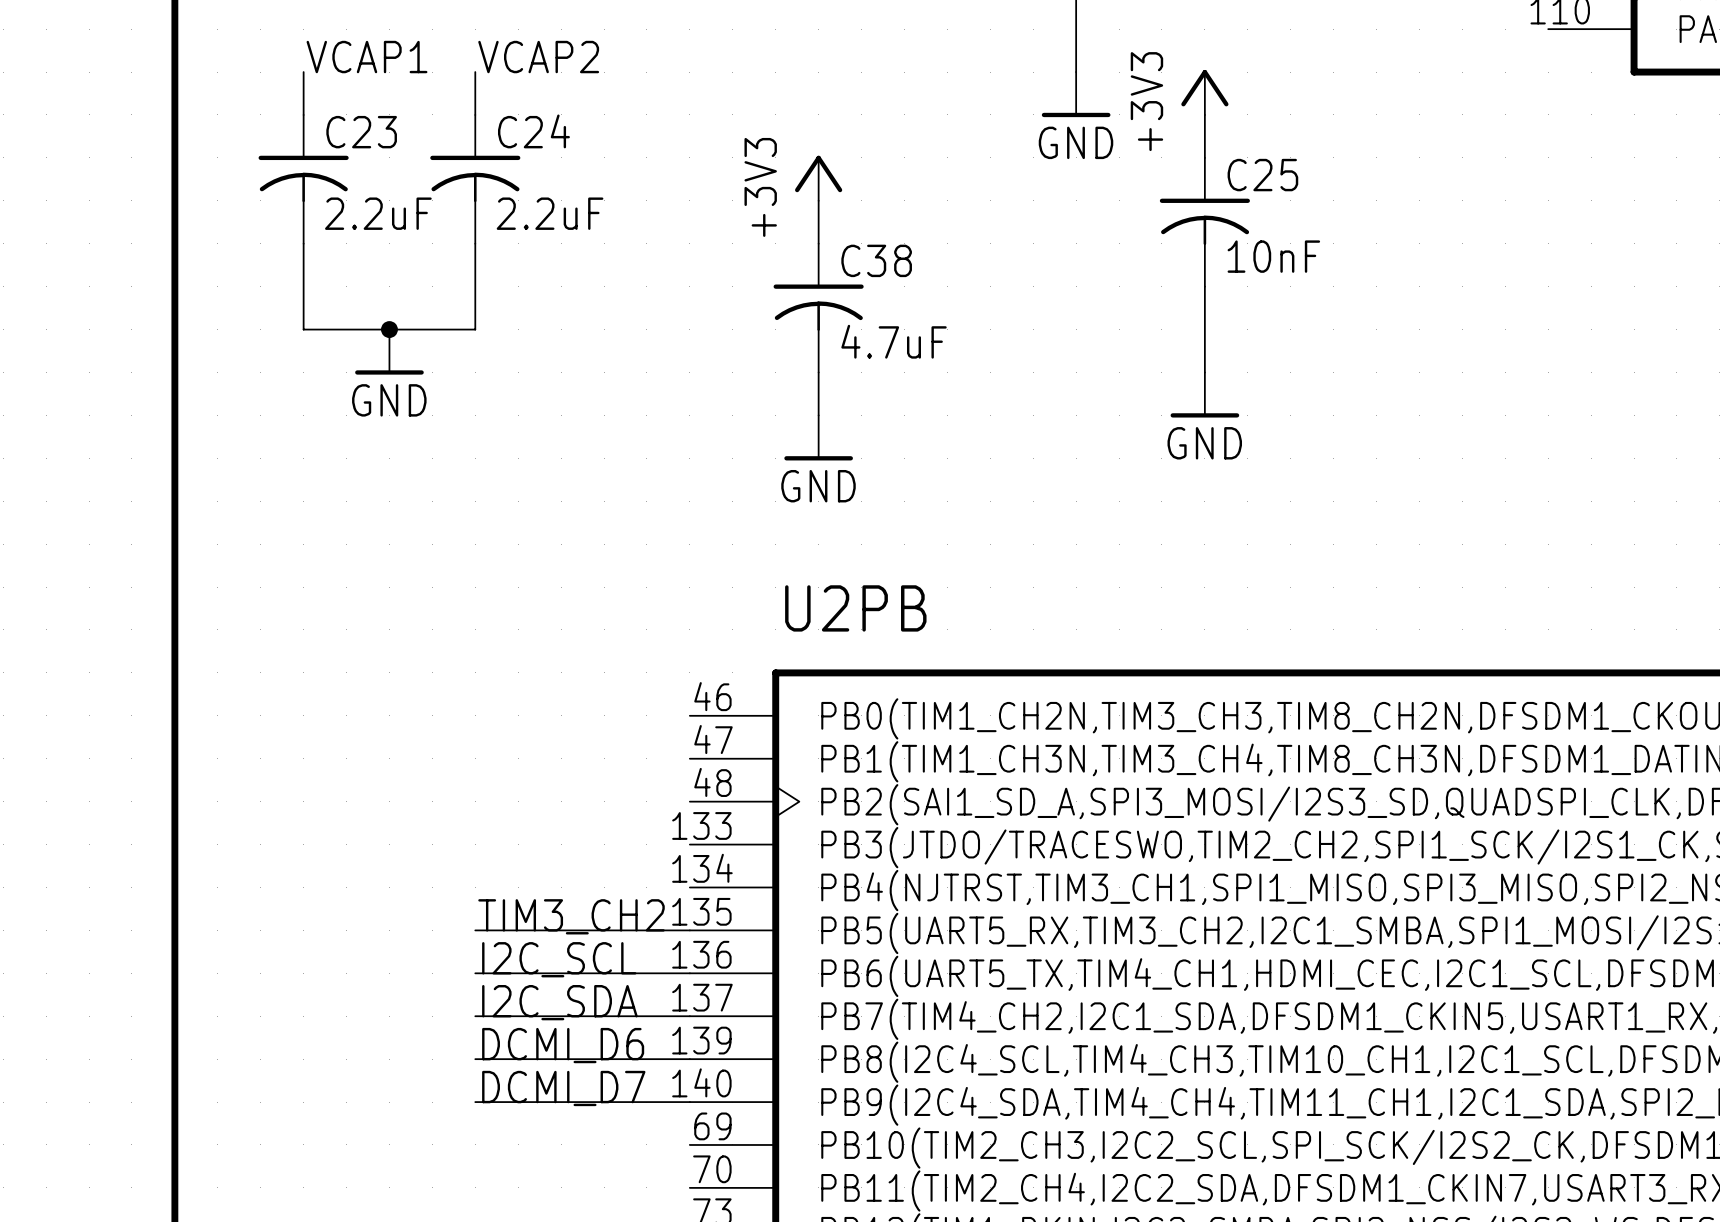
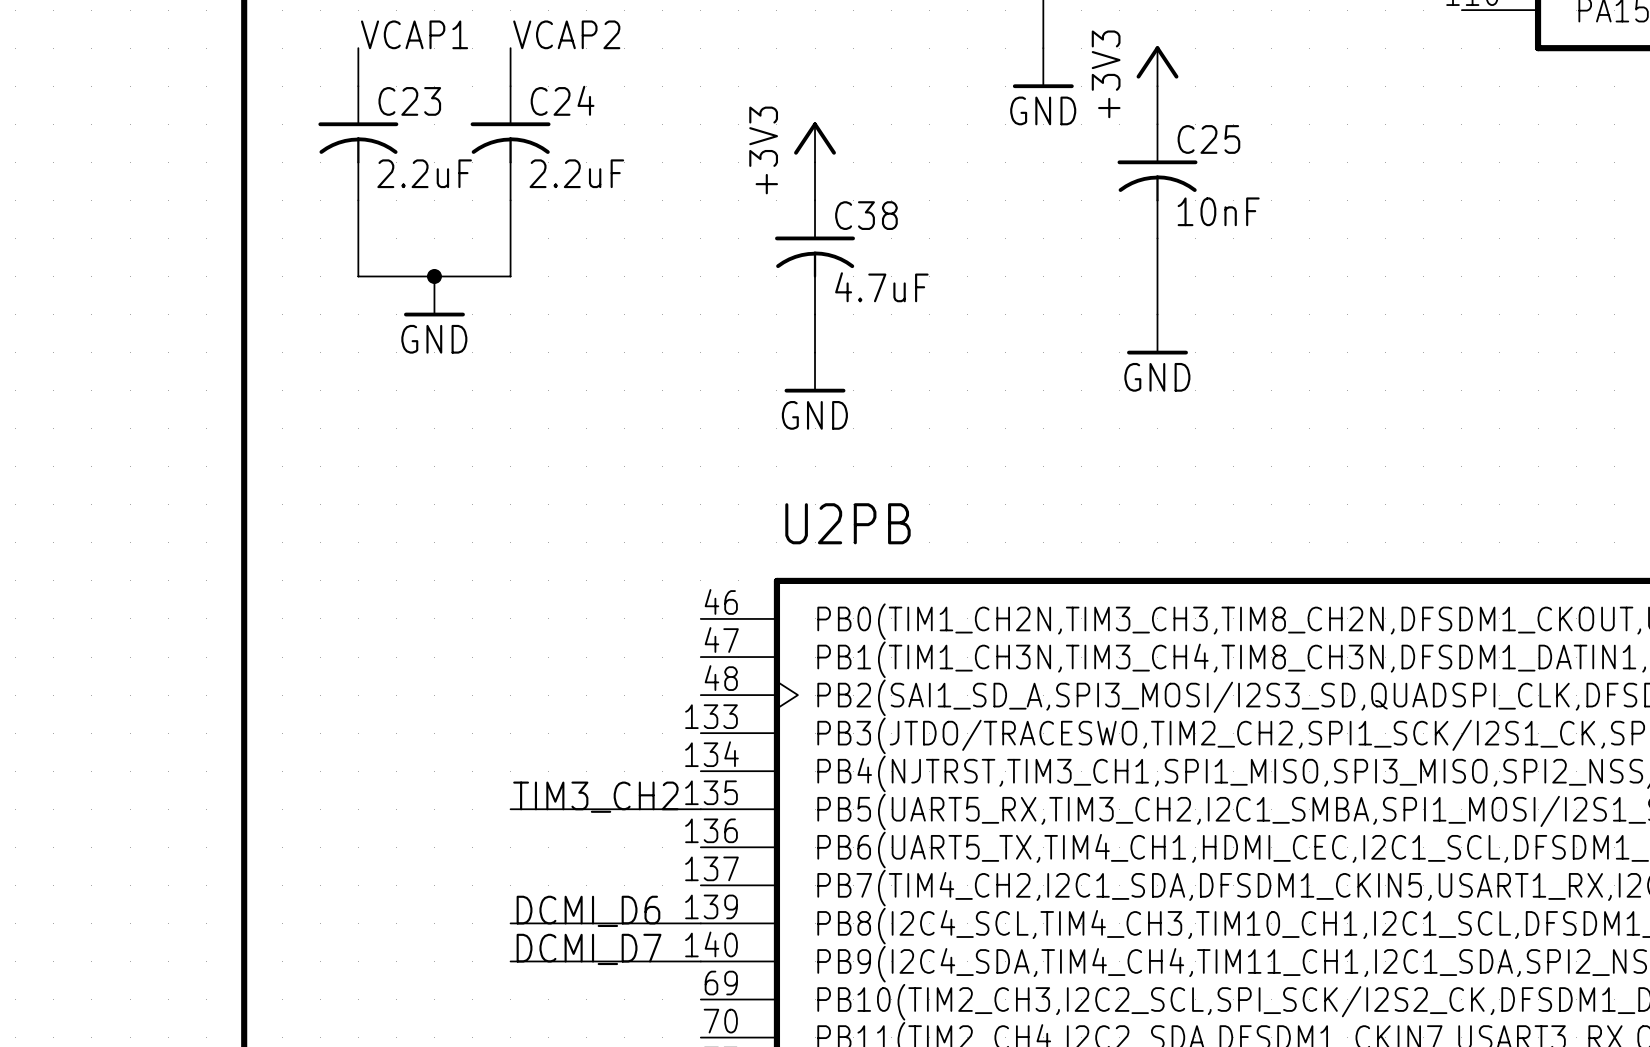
label: I2C_SCL (559, 959) -> none
wire: (475, 973) (689, 973) -> none
label: I2C_SDA (559, 1002) -> none
wire: (475, 1016) (689, 1016) -> none

